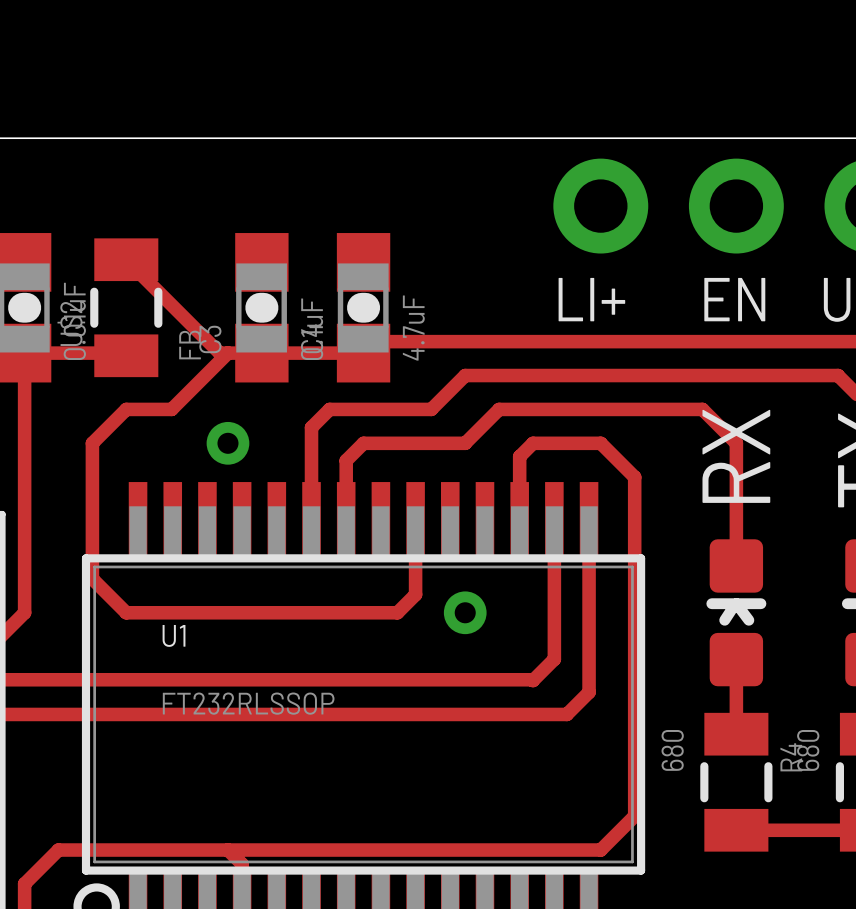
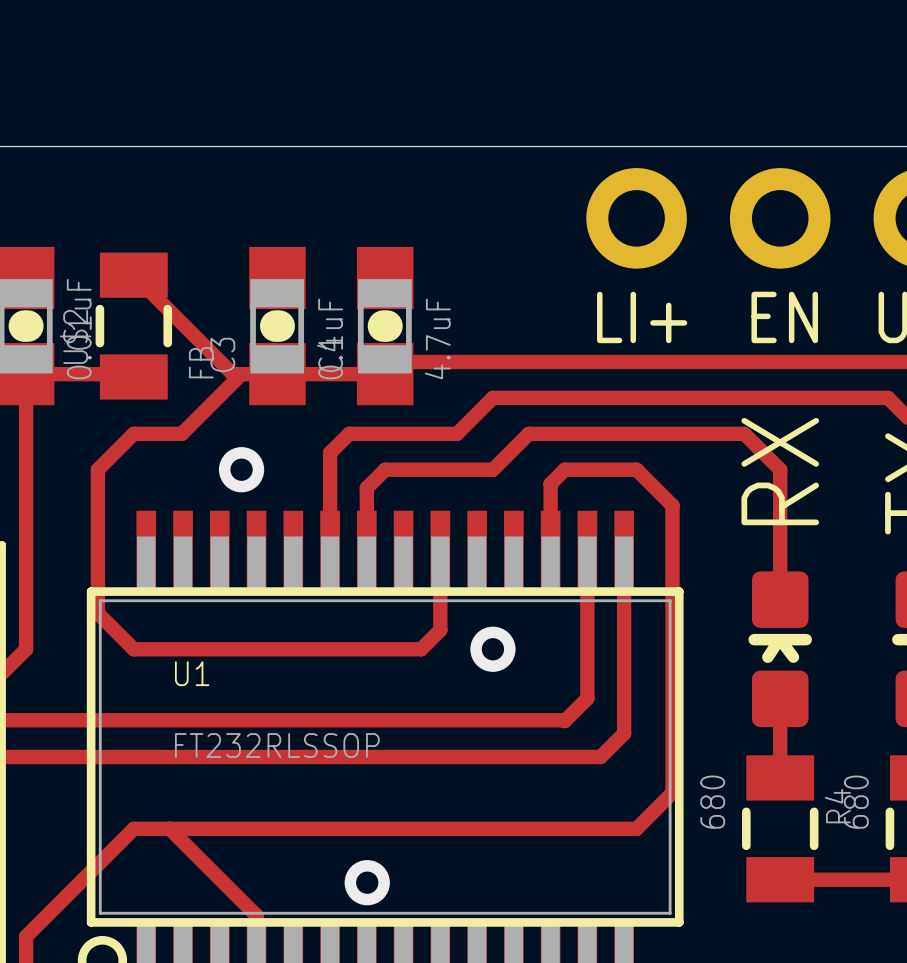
top track: (634, 748) (634, 816) (600, 850) (58, 850) -> (672, 792) (636, 828) (133, 828) (62, 900)
top track: none -> (169, 828) (241, 900)
via: none -> (367, 882)

